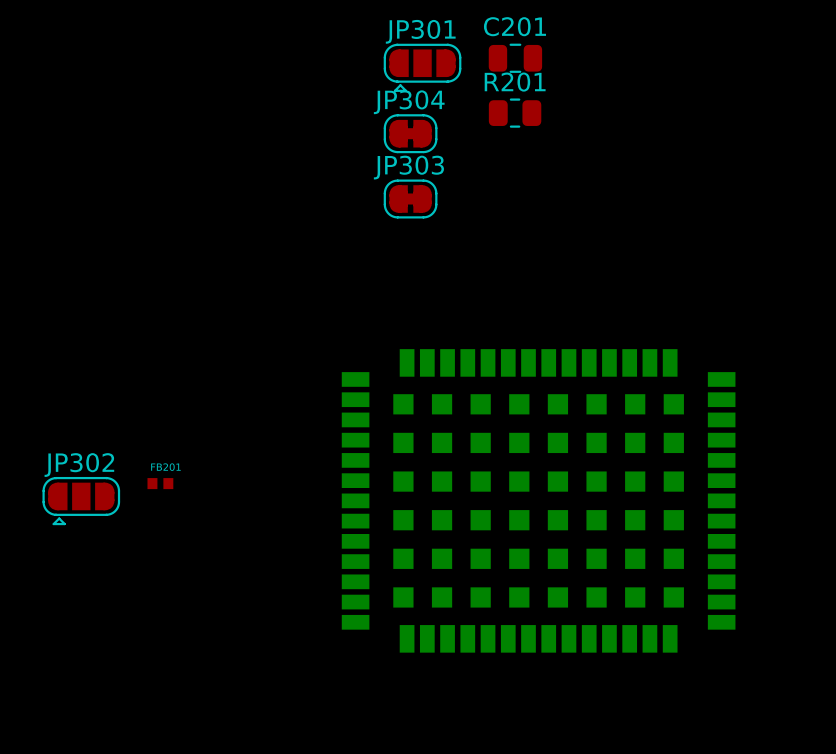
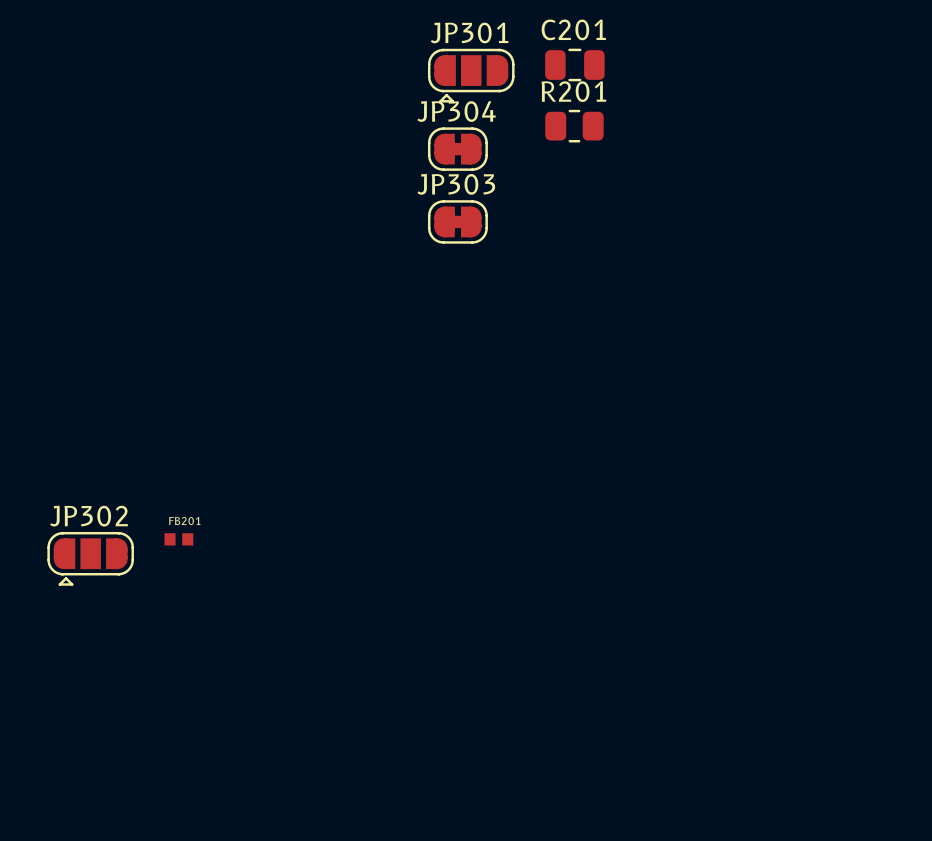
part: (538, 500) -> none

